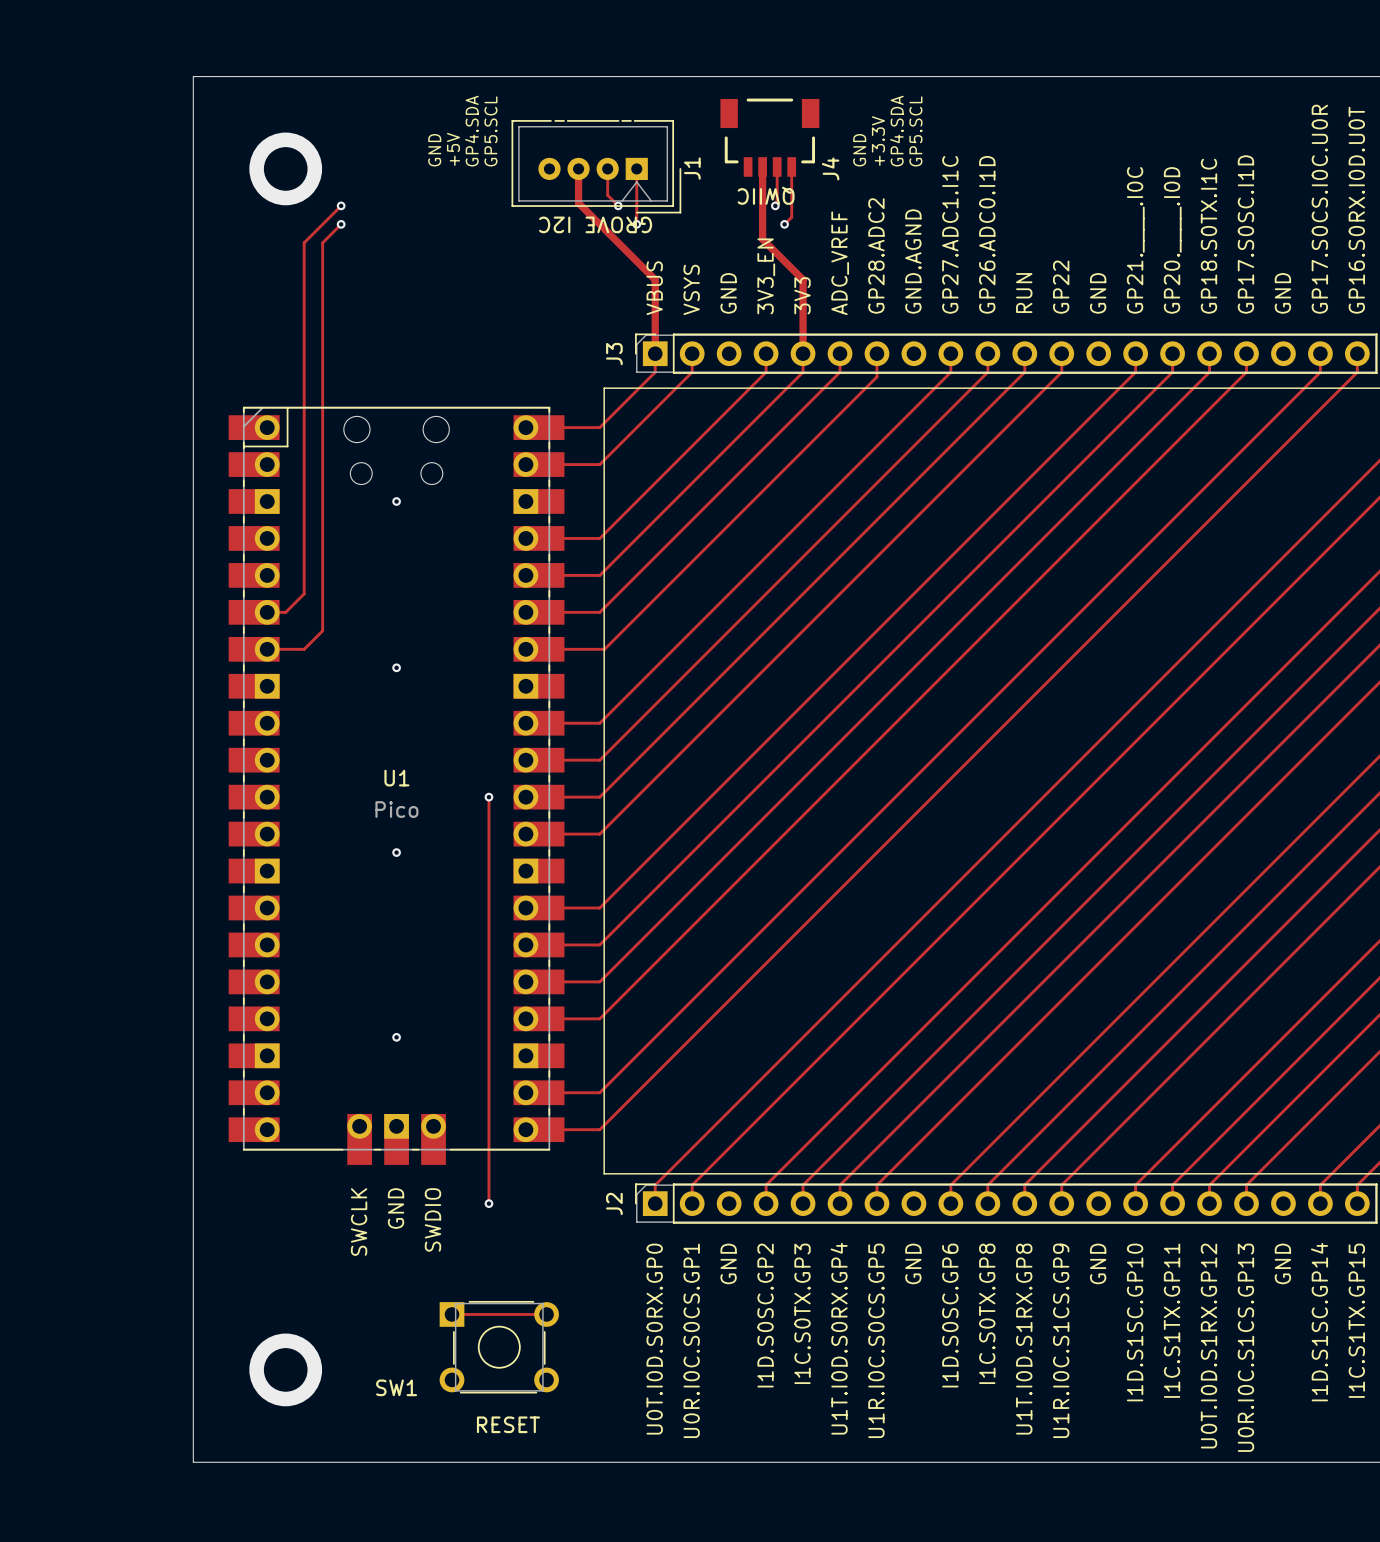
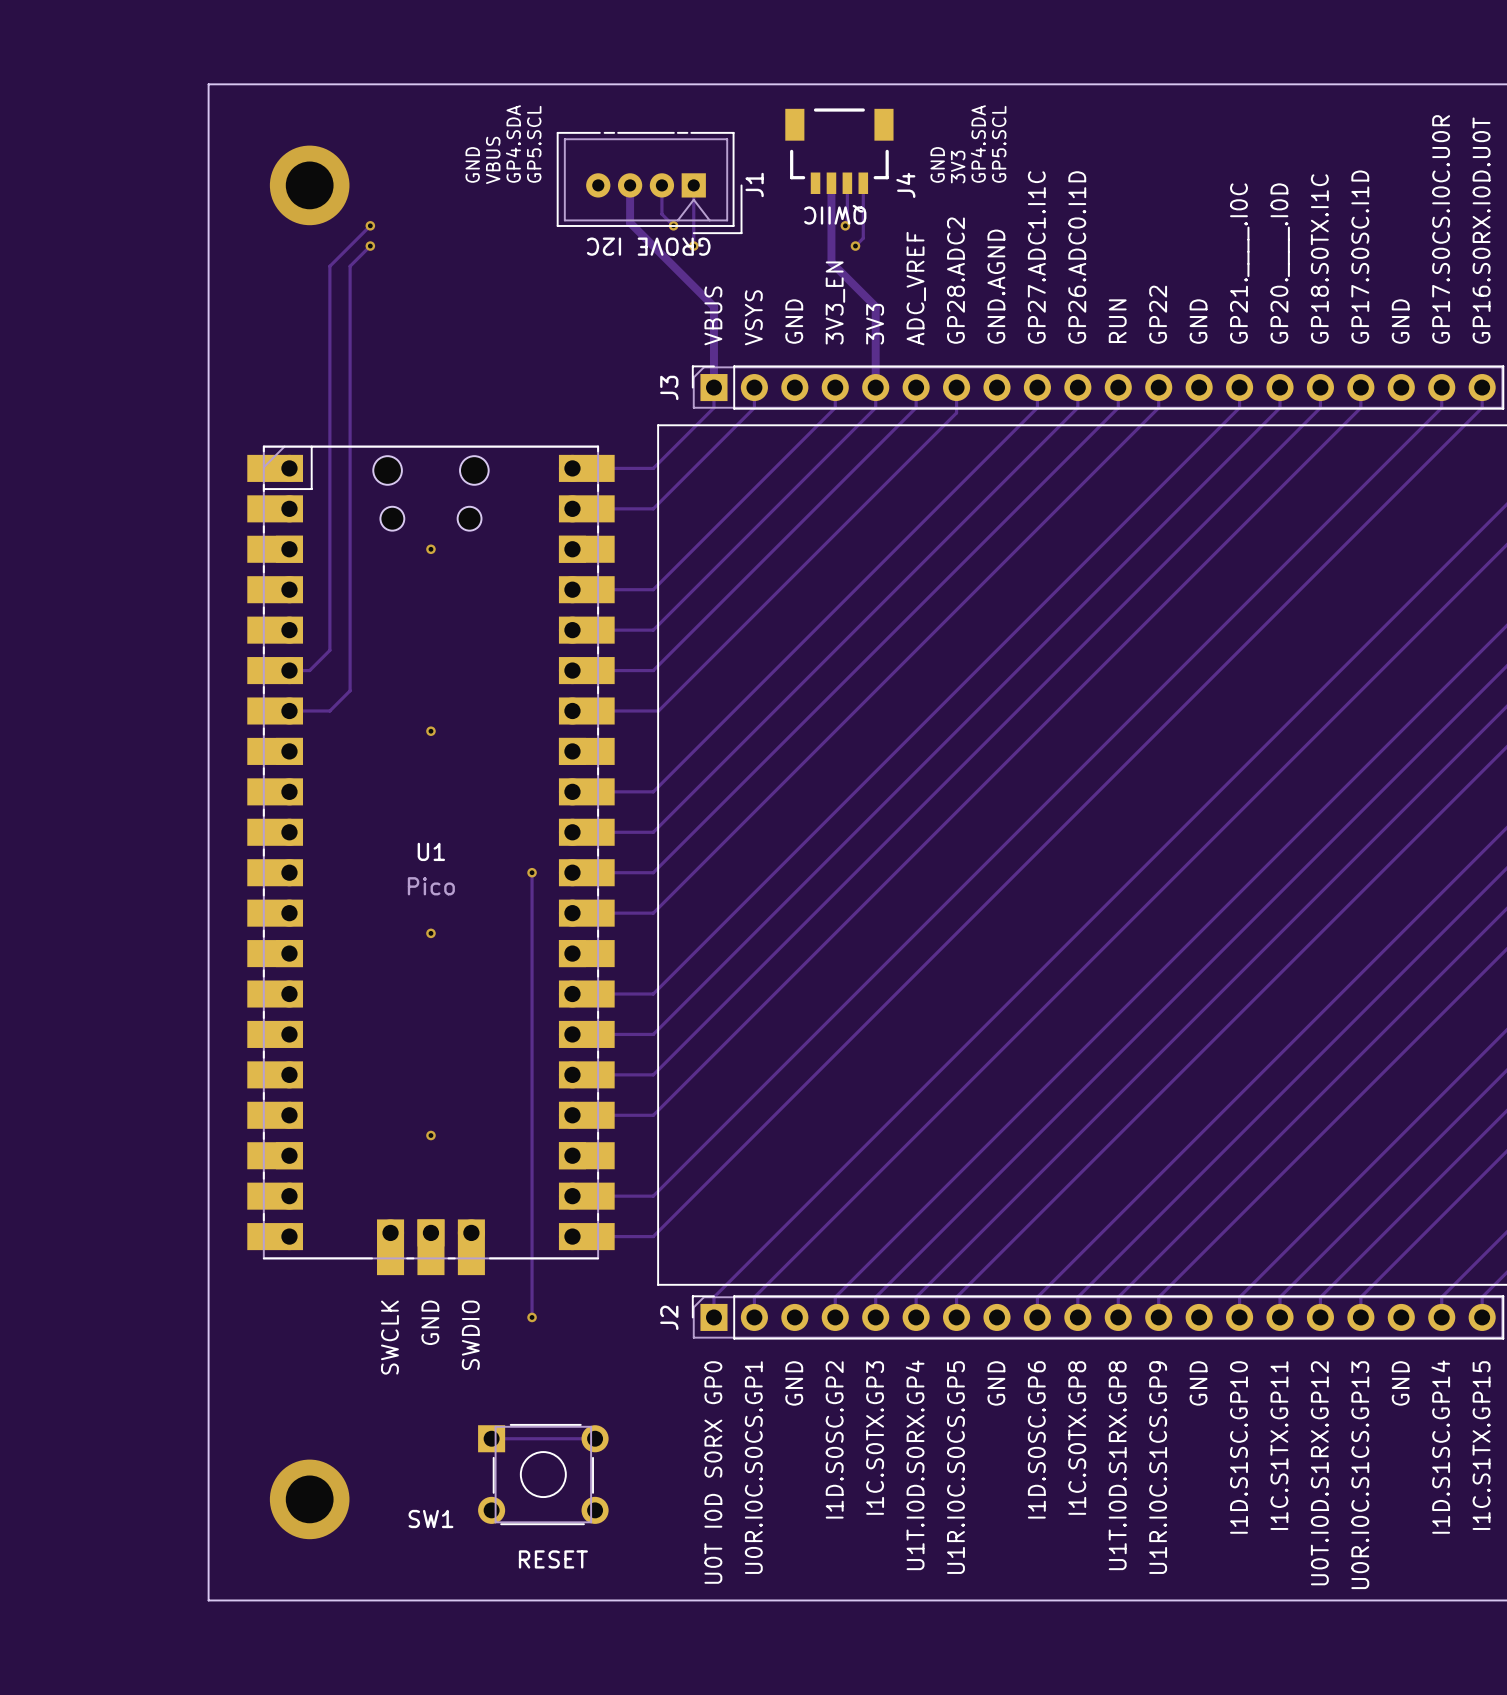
text: +3.3V (878, 141) -> 3V3 (958, 167)
text: +5V (453, 149) -> VBUS (493, 160)
text: U0T.I0D.S0RX.GP0 (654, 1339) -> U0T I0D S0RX GP0 (713, 1472)

